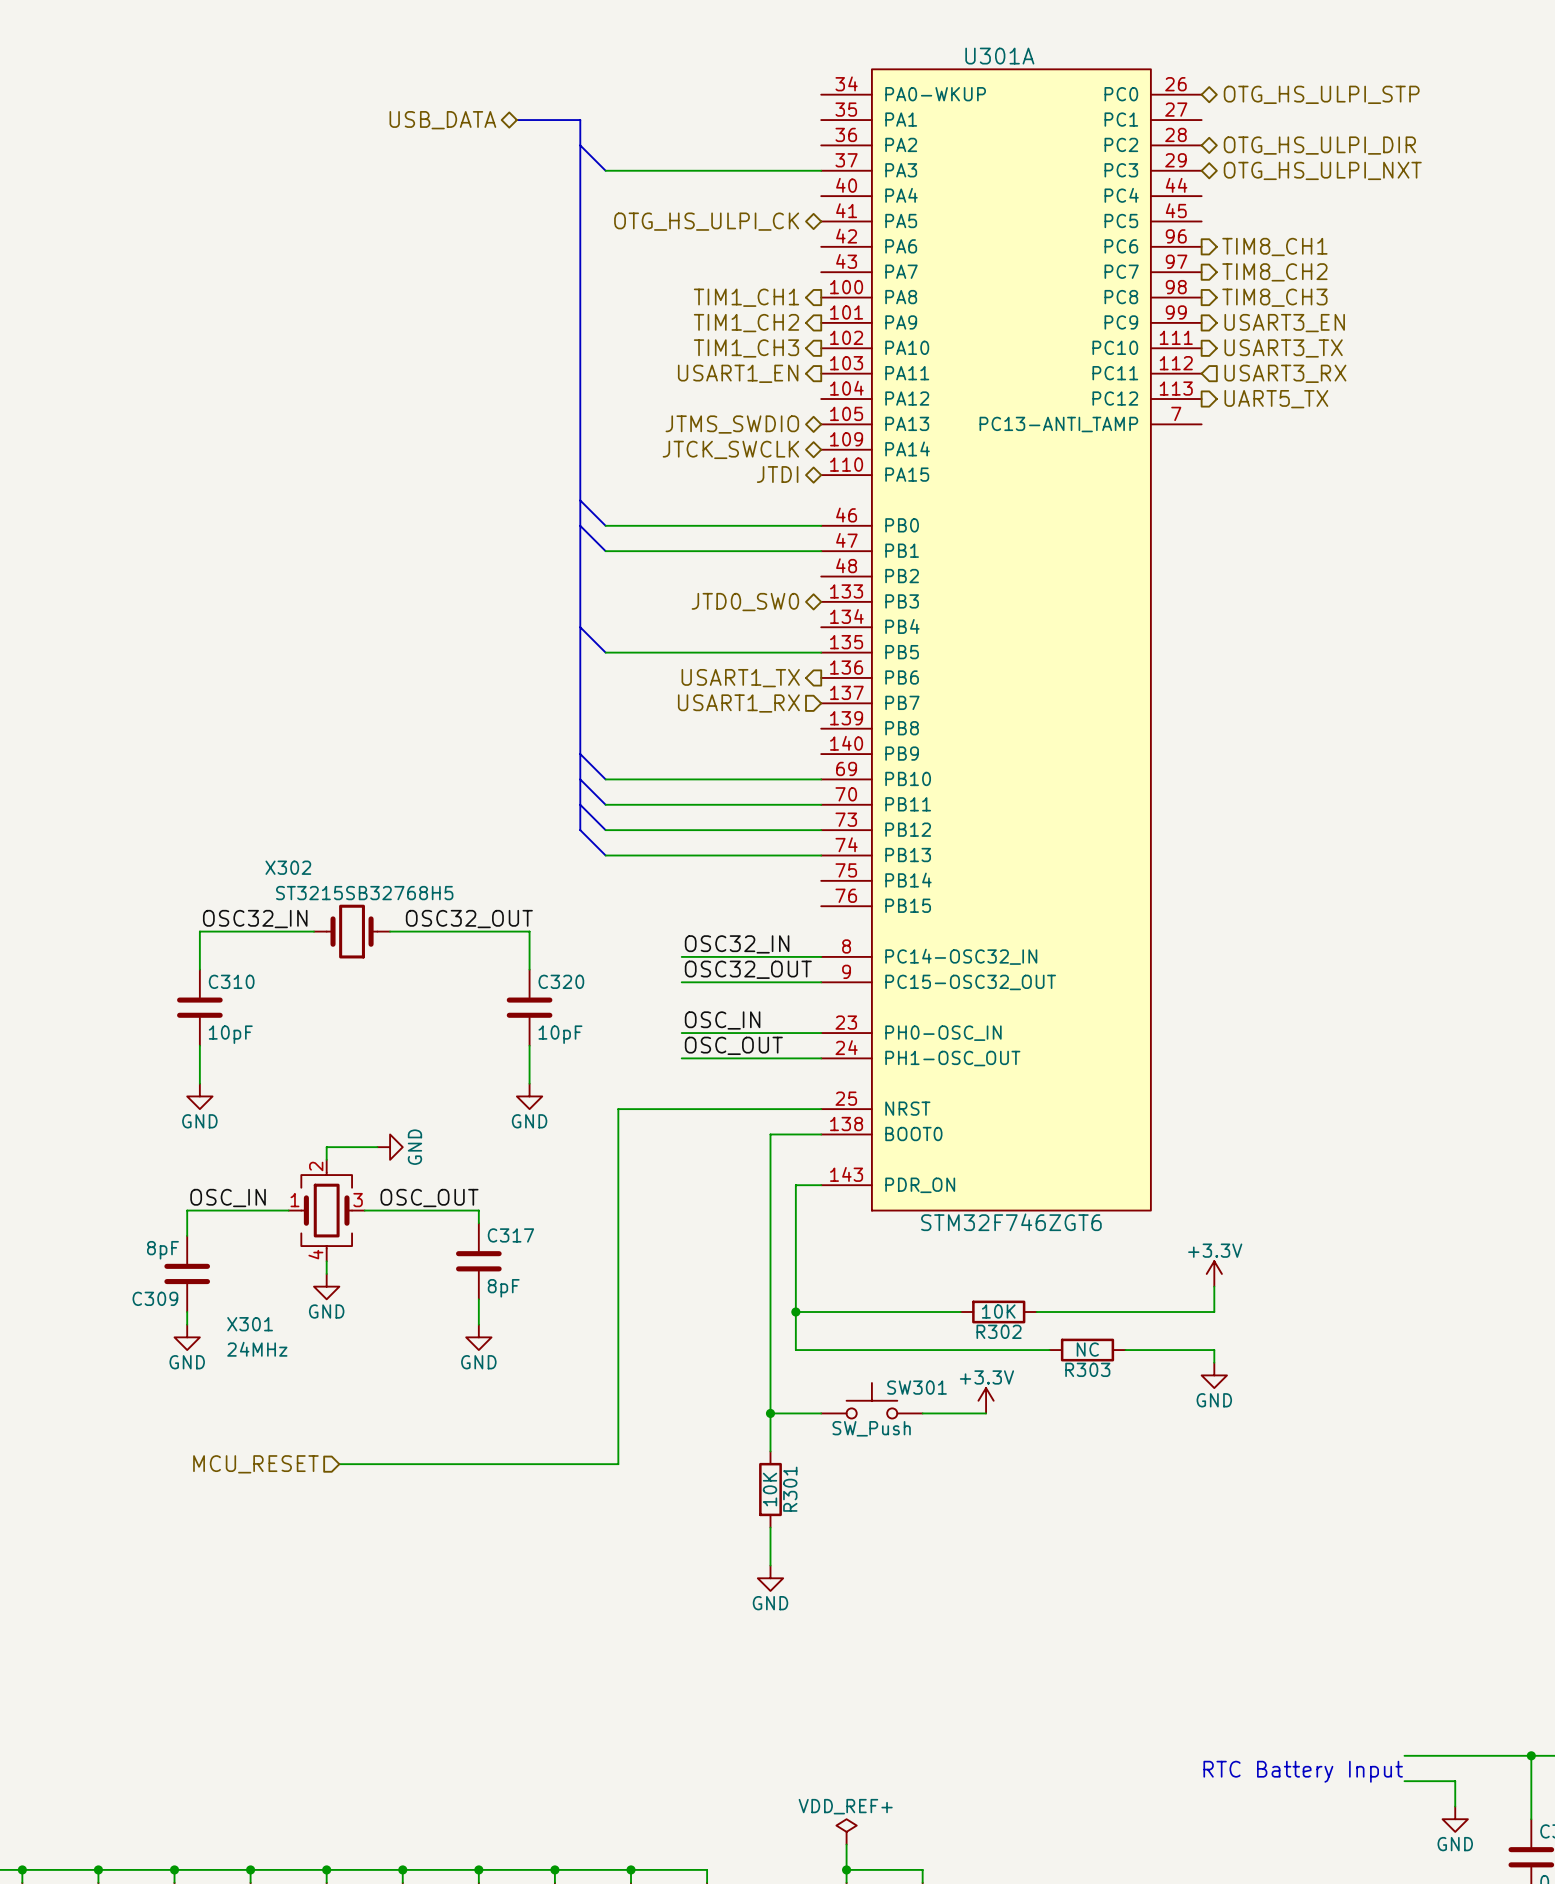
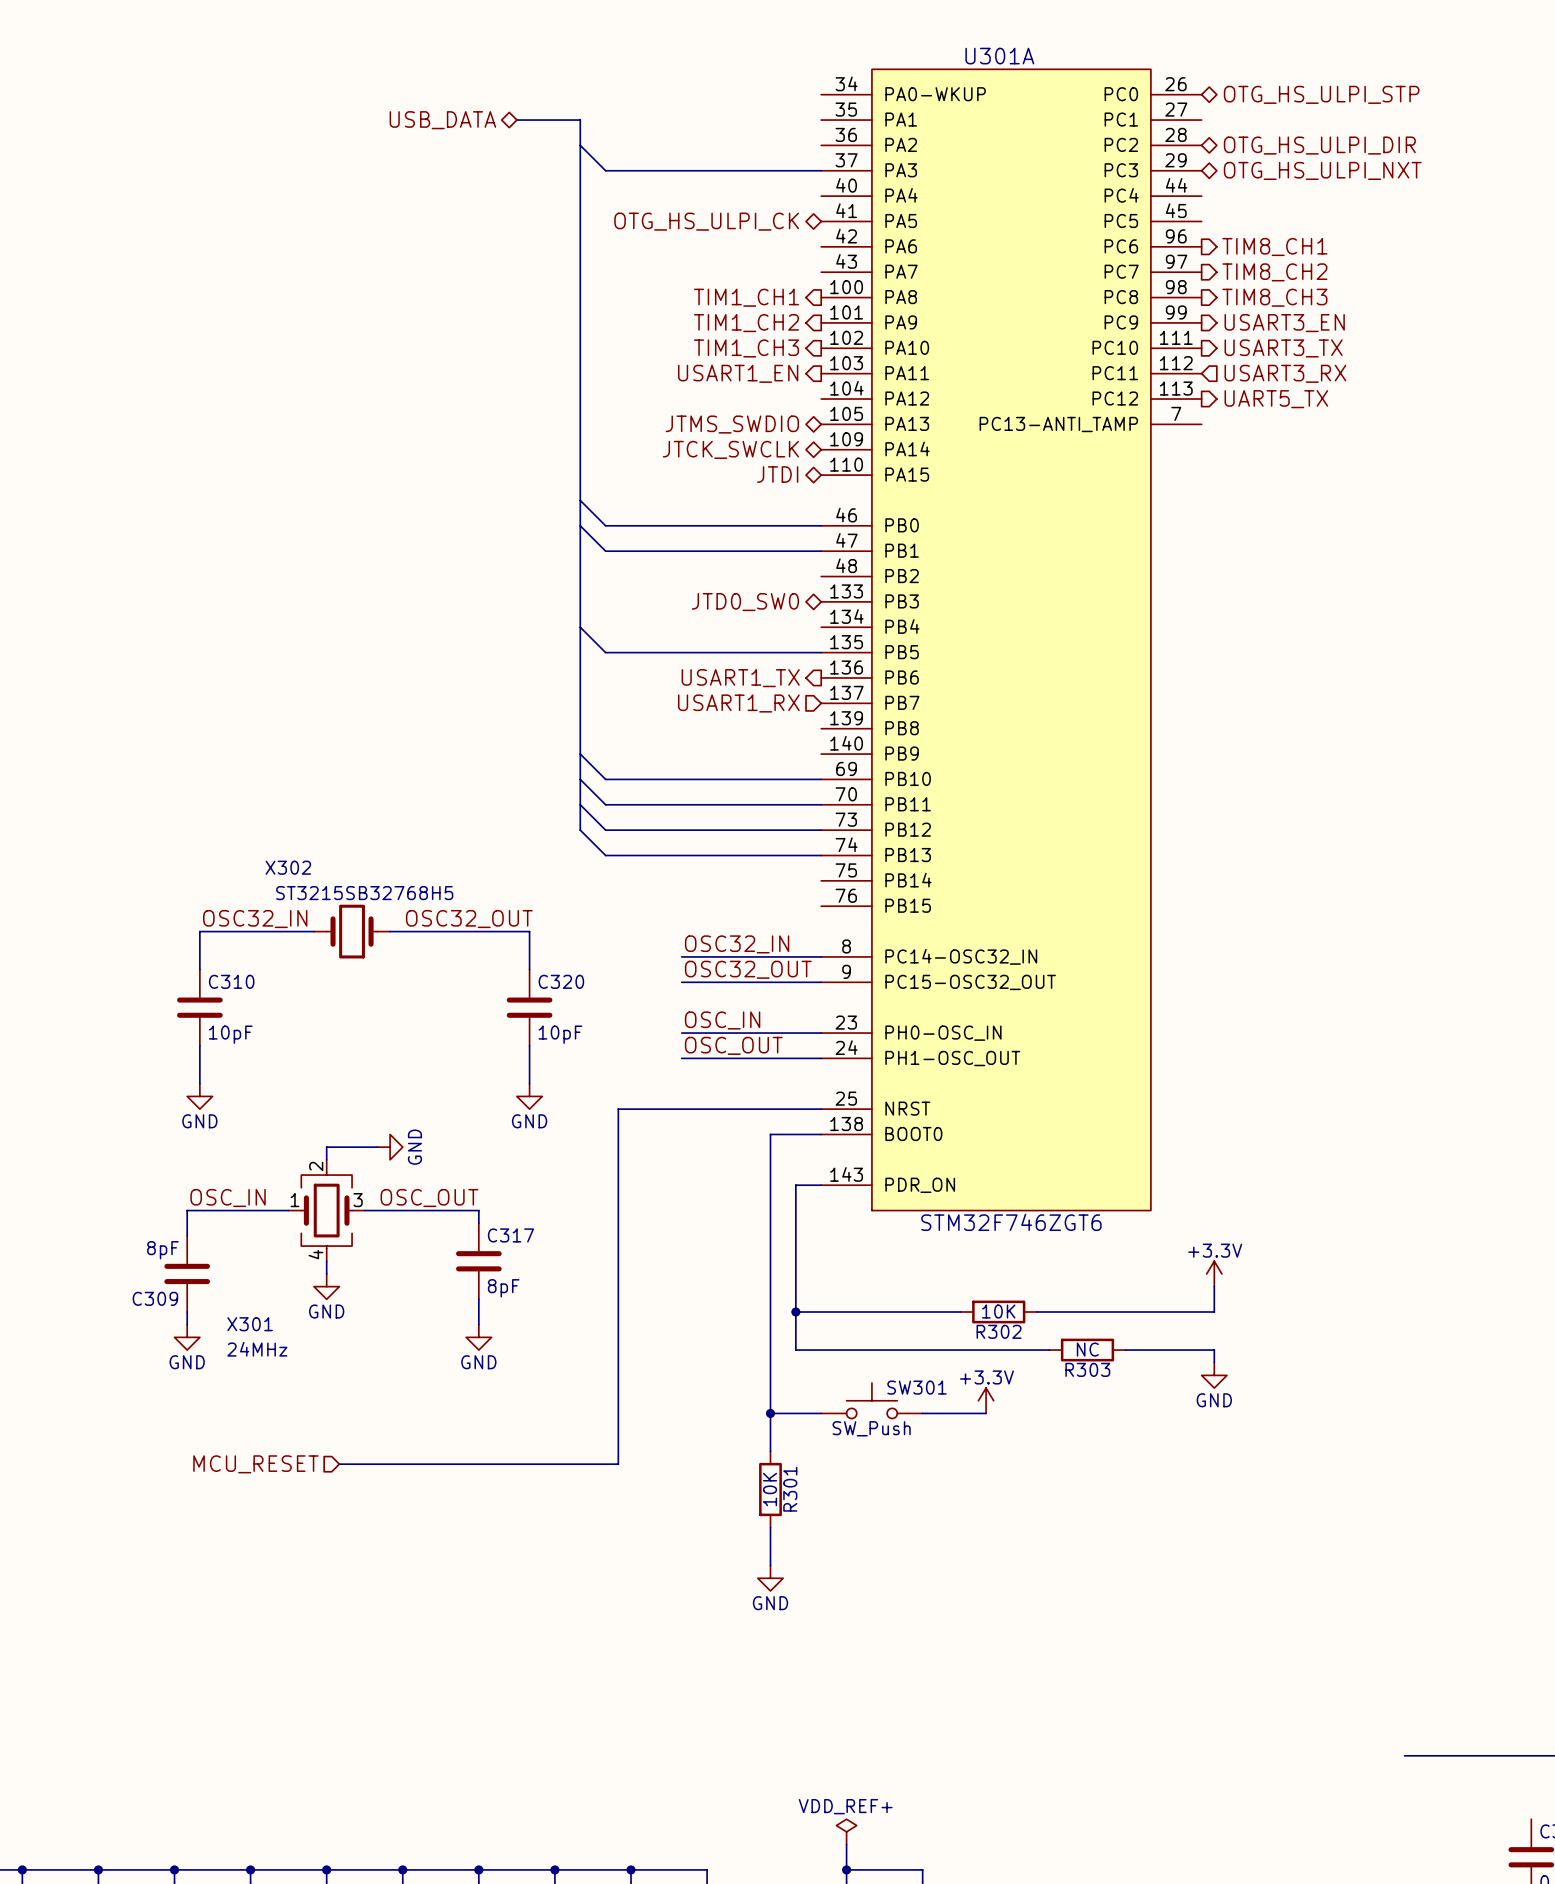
wire: (1531, 1755) (1531, 1819) -> none
junction: (1531, 1755) -> none
text: RTC Battery Input (1303, 1771) -> none
wire: (1404, 1781) (1455, 1781) (1455, 1806) -> none
power symbol: GND (1455, 1819) -> none

